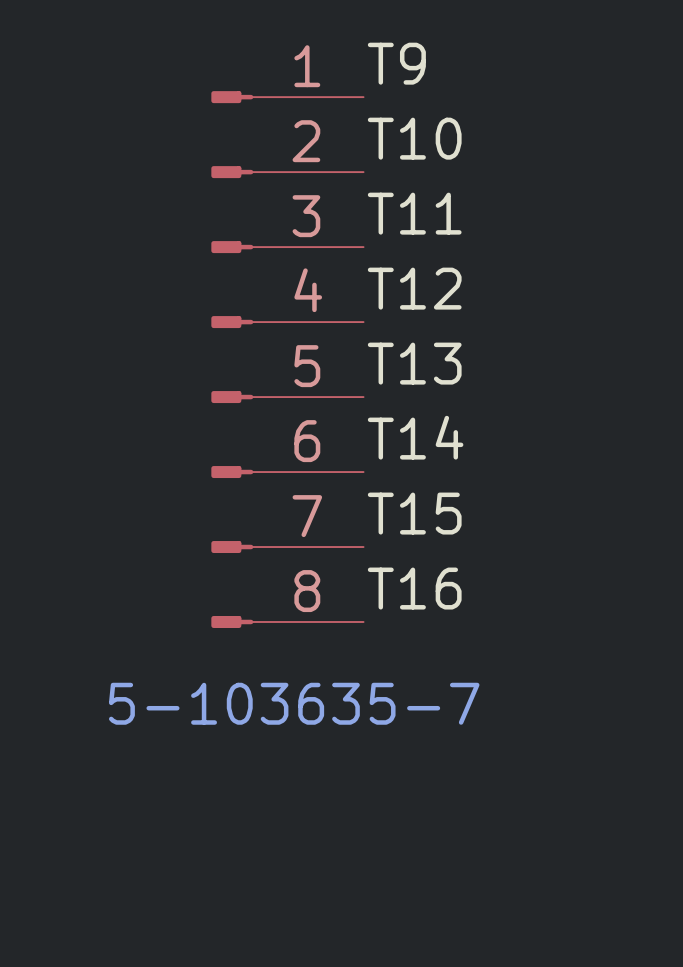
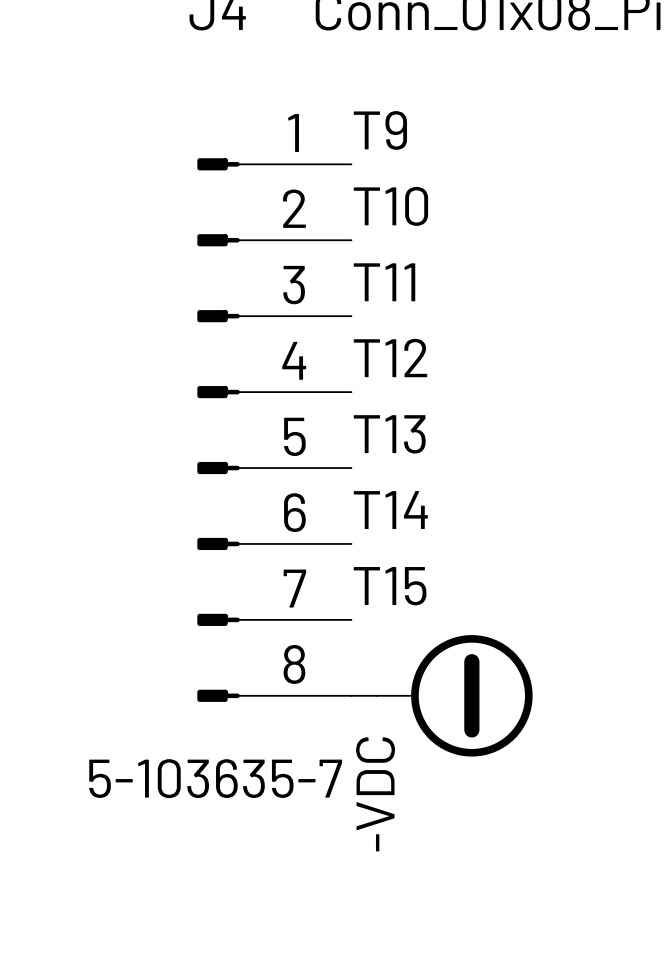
label: T16 (414, 588) -> none
wire: none -> (351, 695) (376, 695)
power symbol: none -> -VDC (454, 695)

